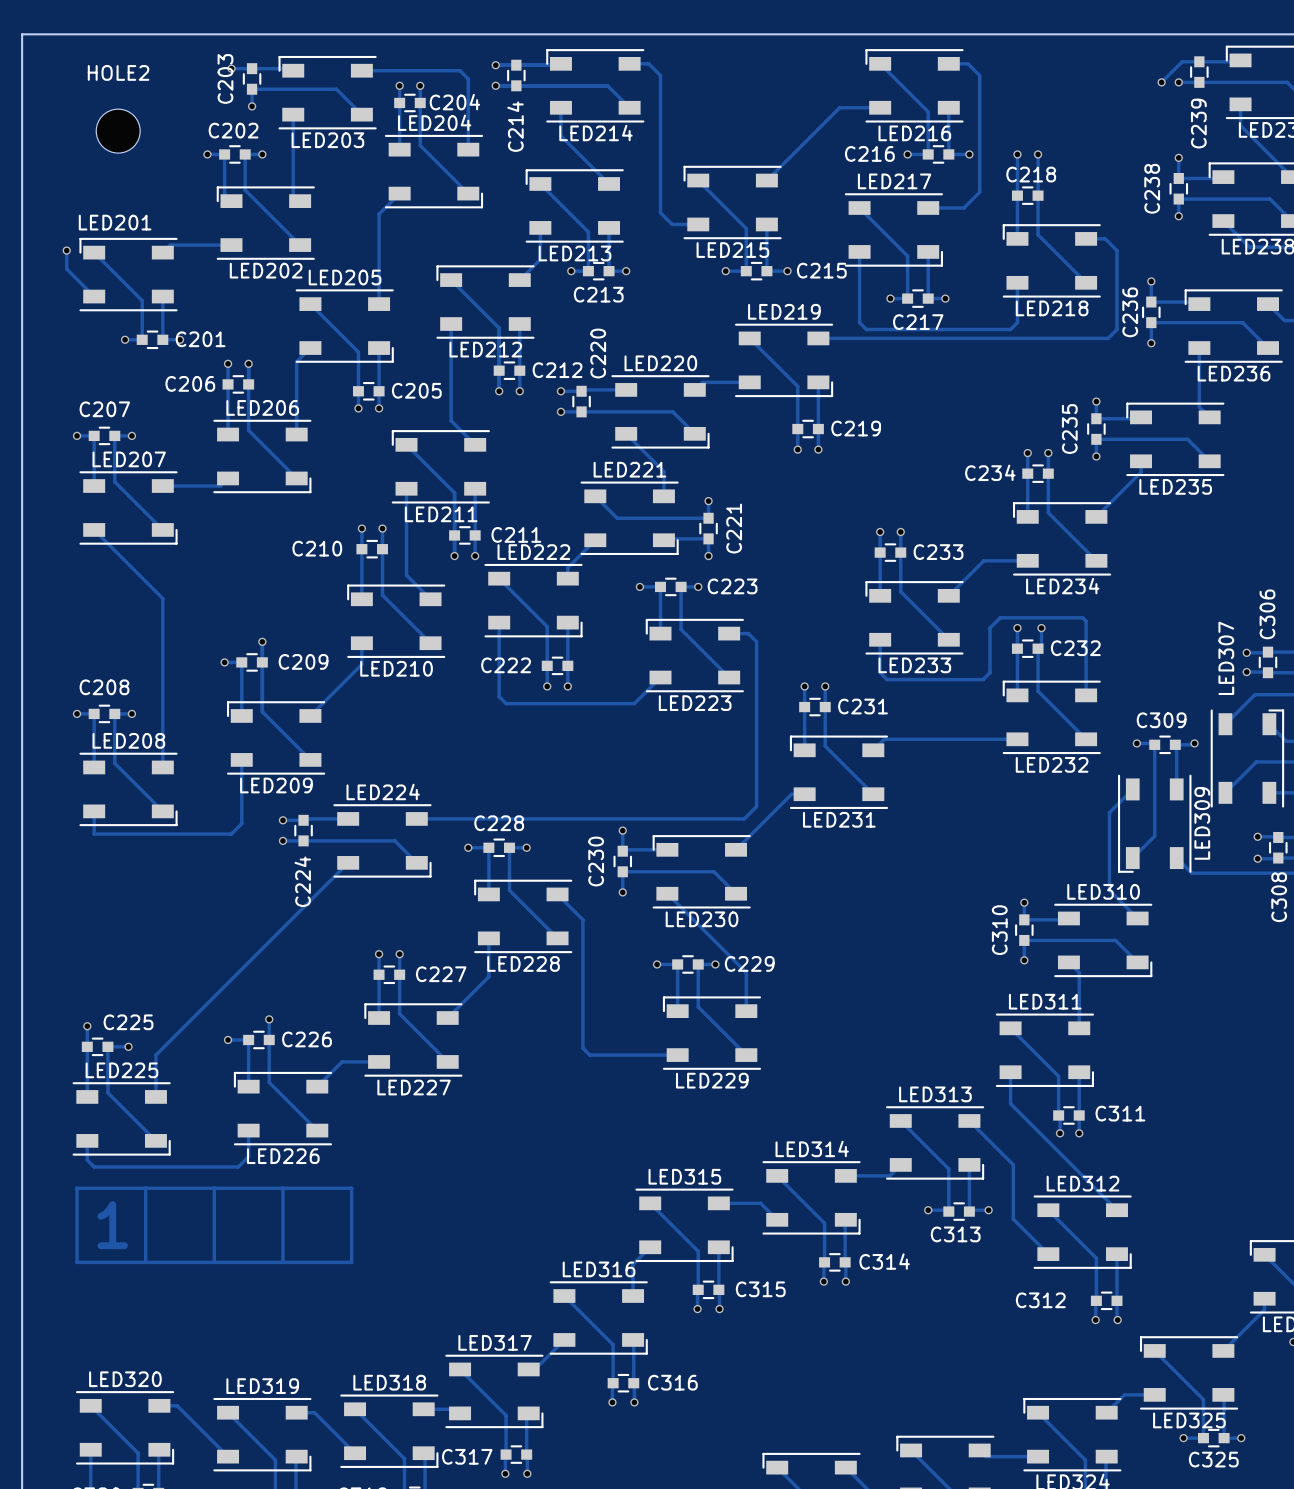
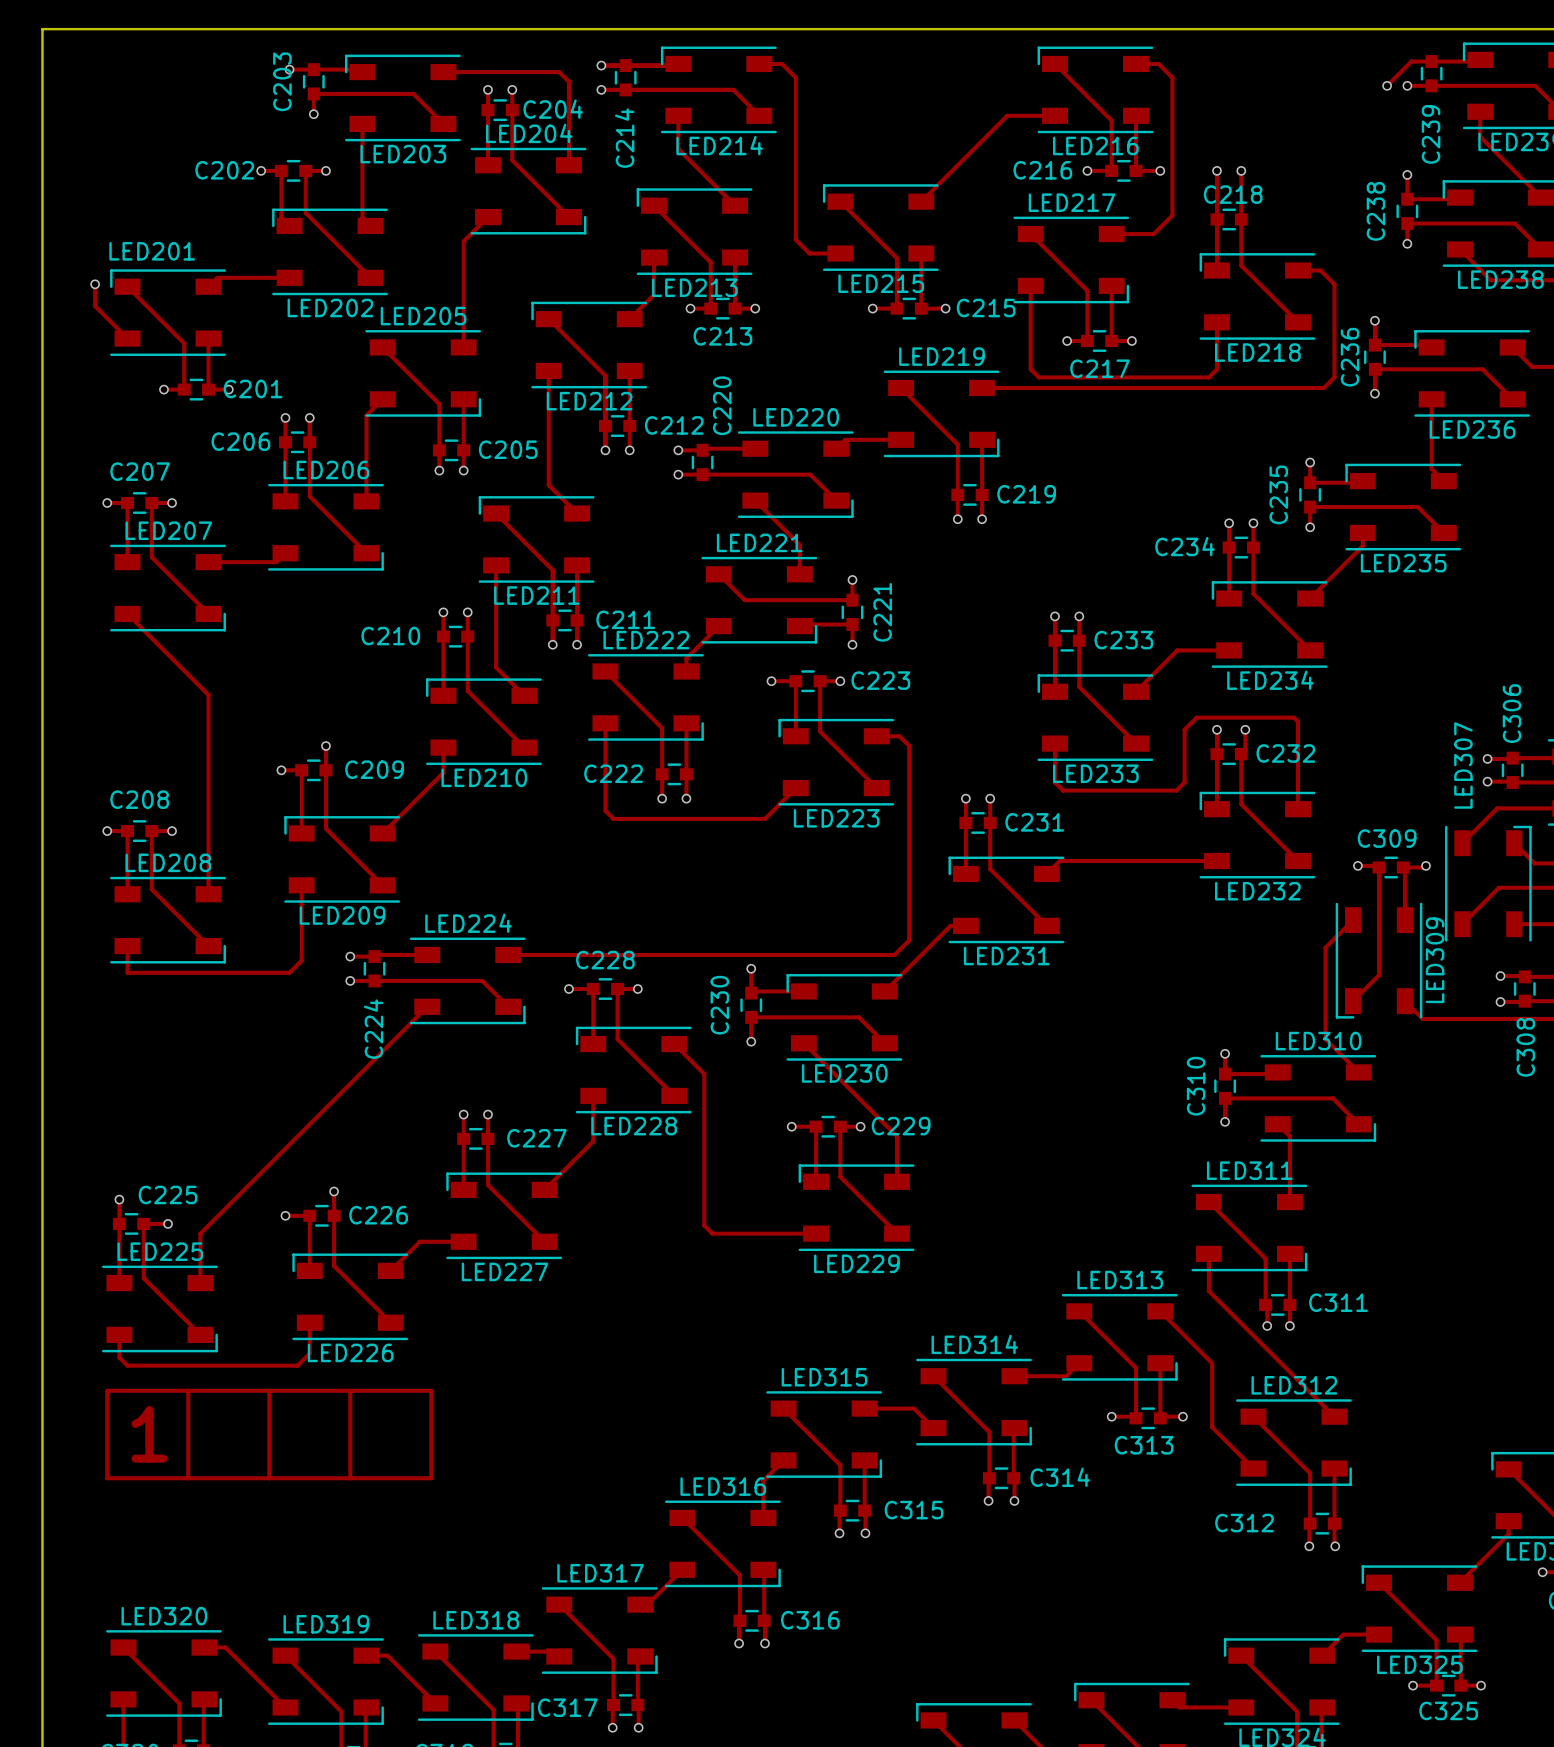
C202 name position: C202 (233, 130) -> C202 (224, 170)
HOLE2: (118, 131) -> none

